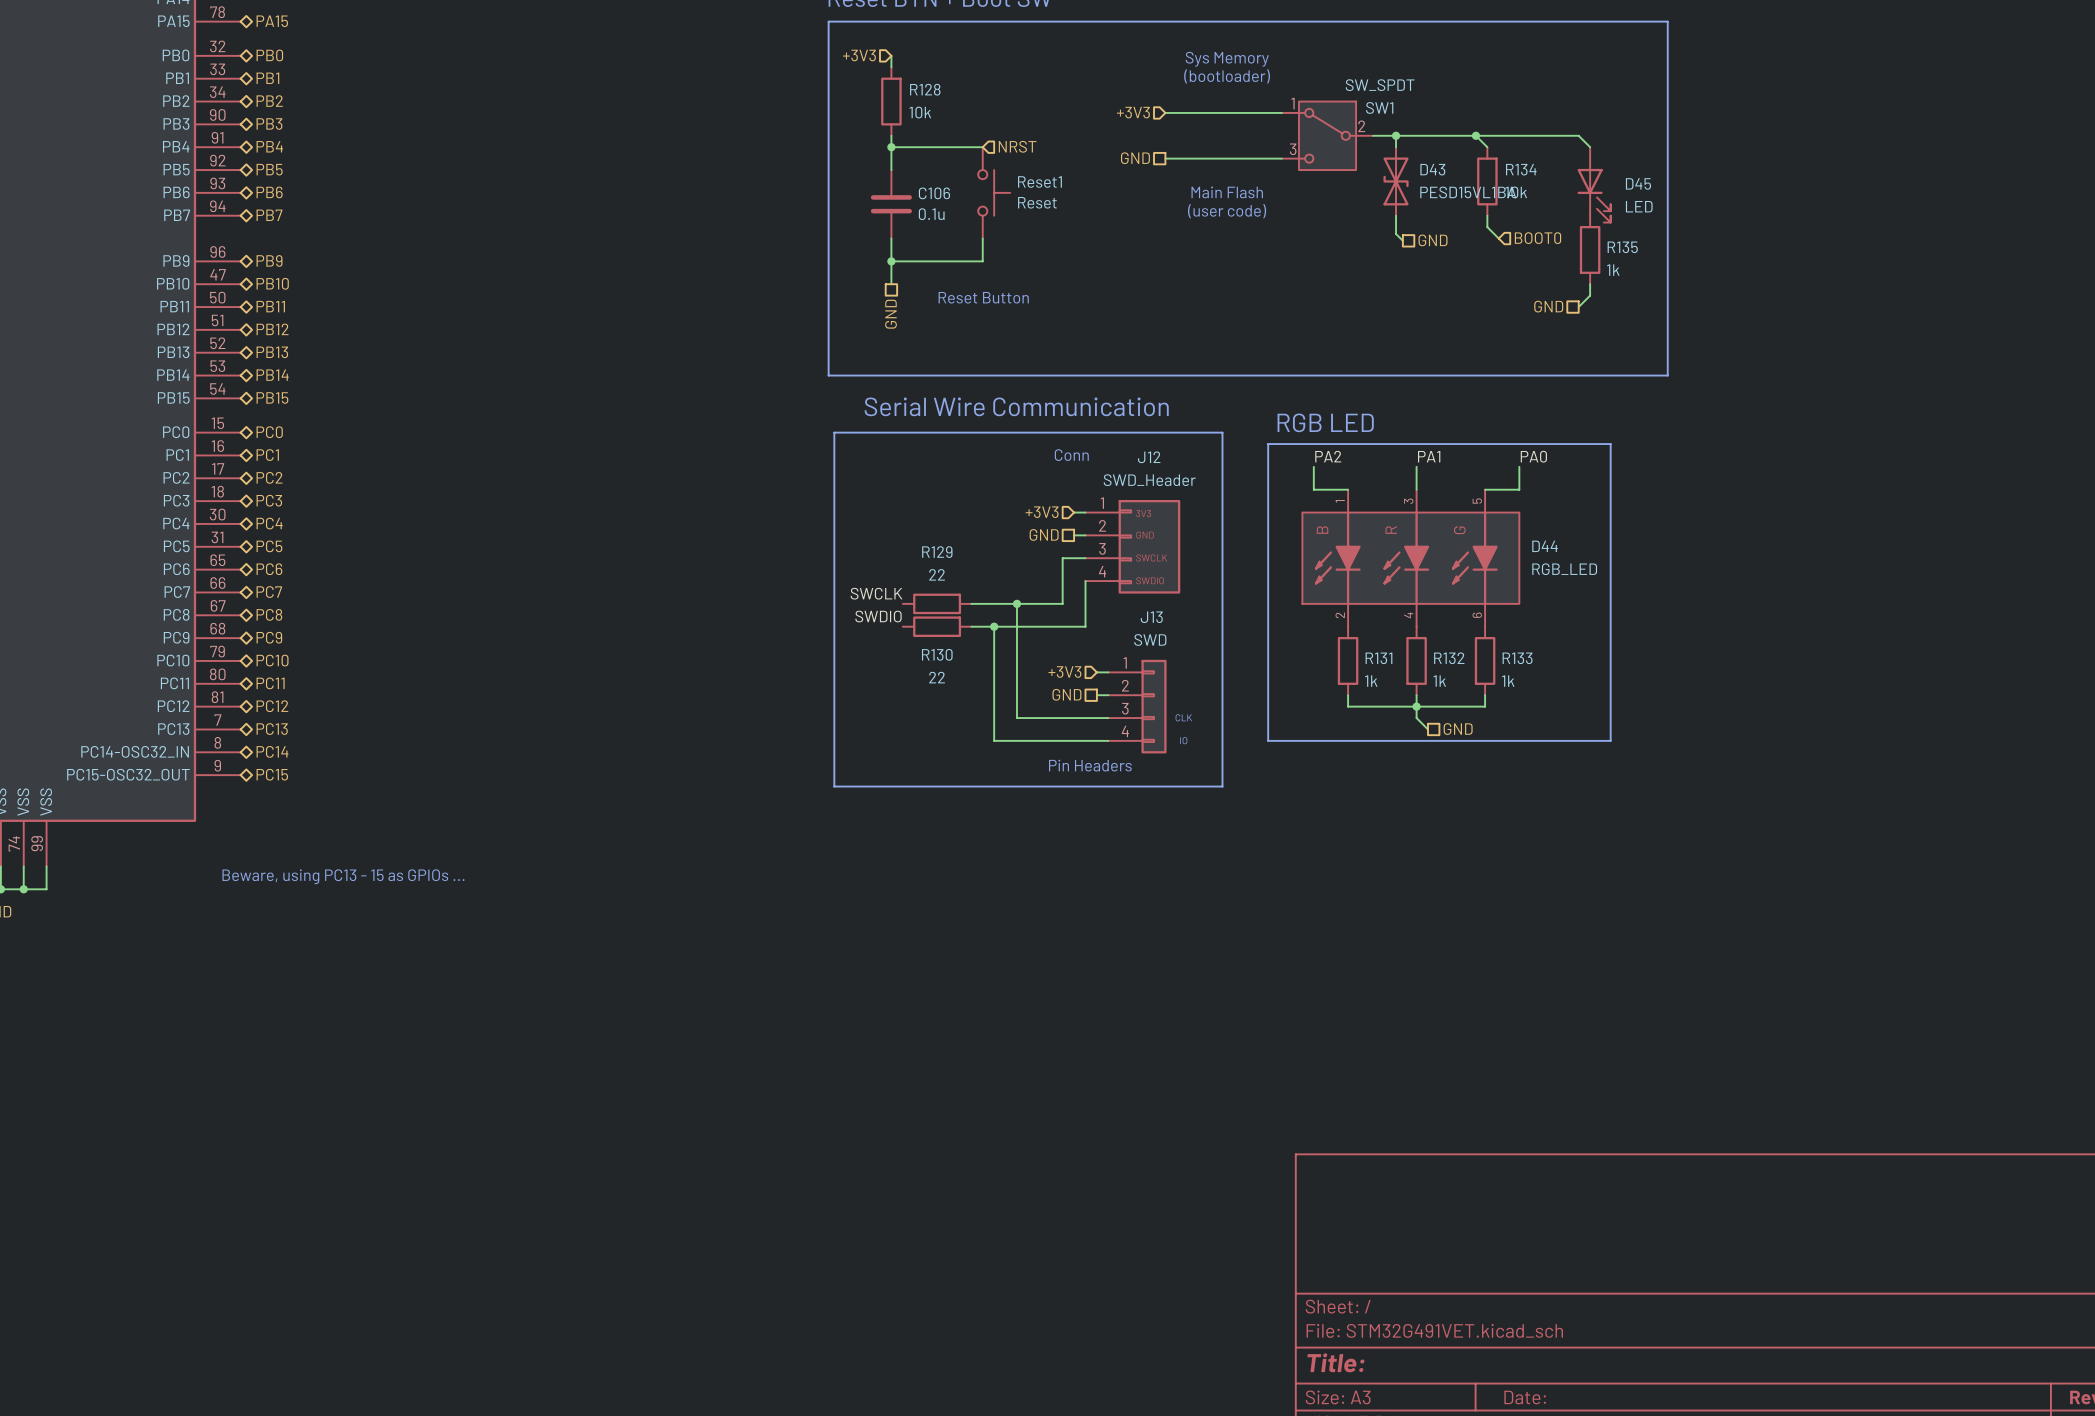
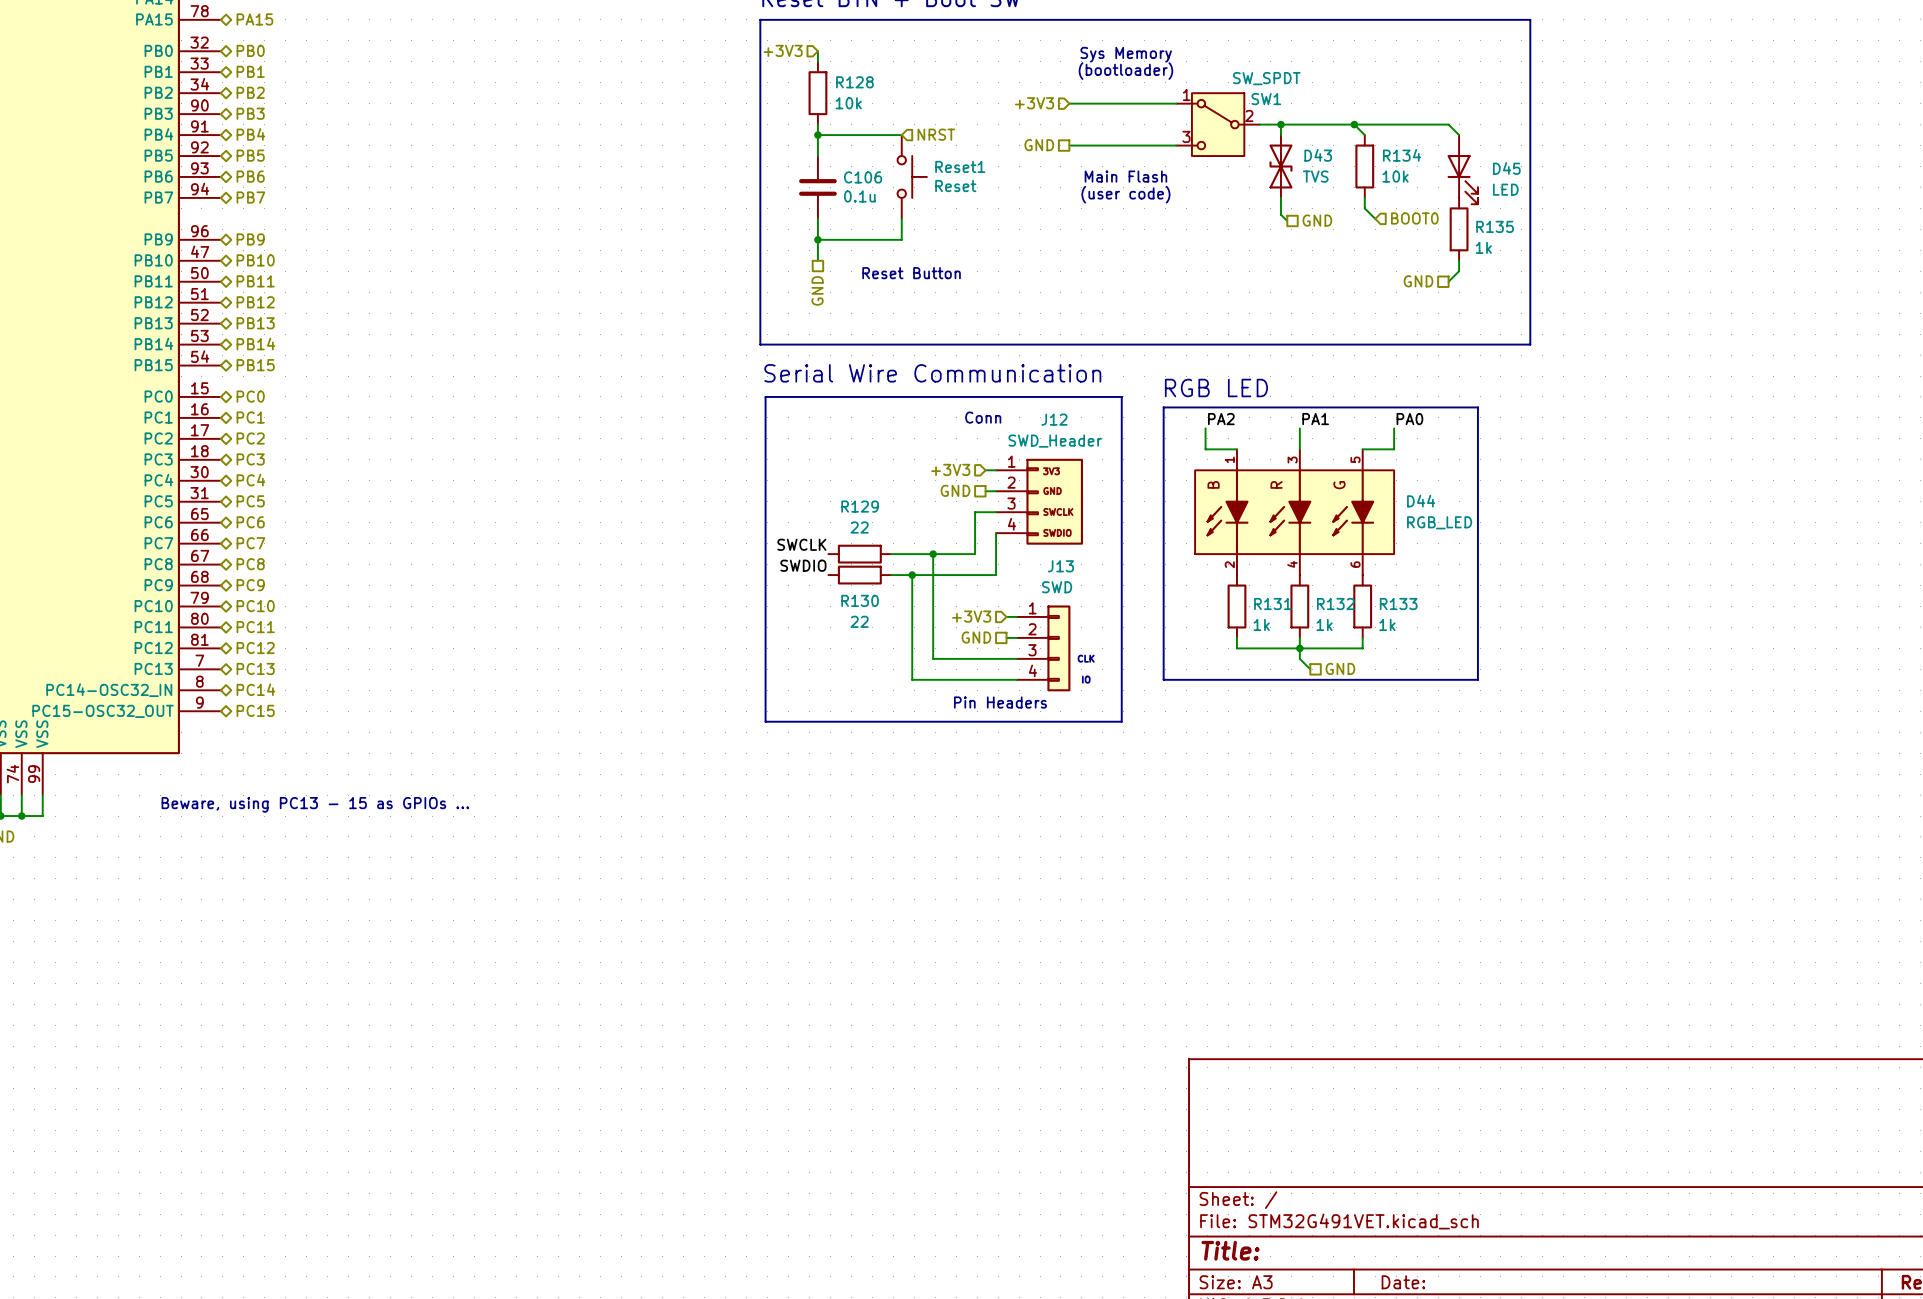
D43 value: PESD15VL1BA (1468, 192) -> TVS (1315, 176)

